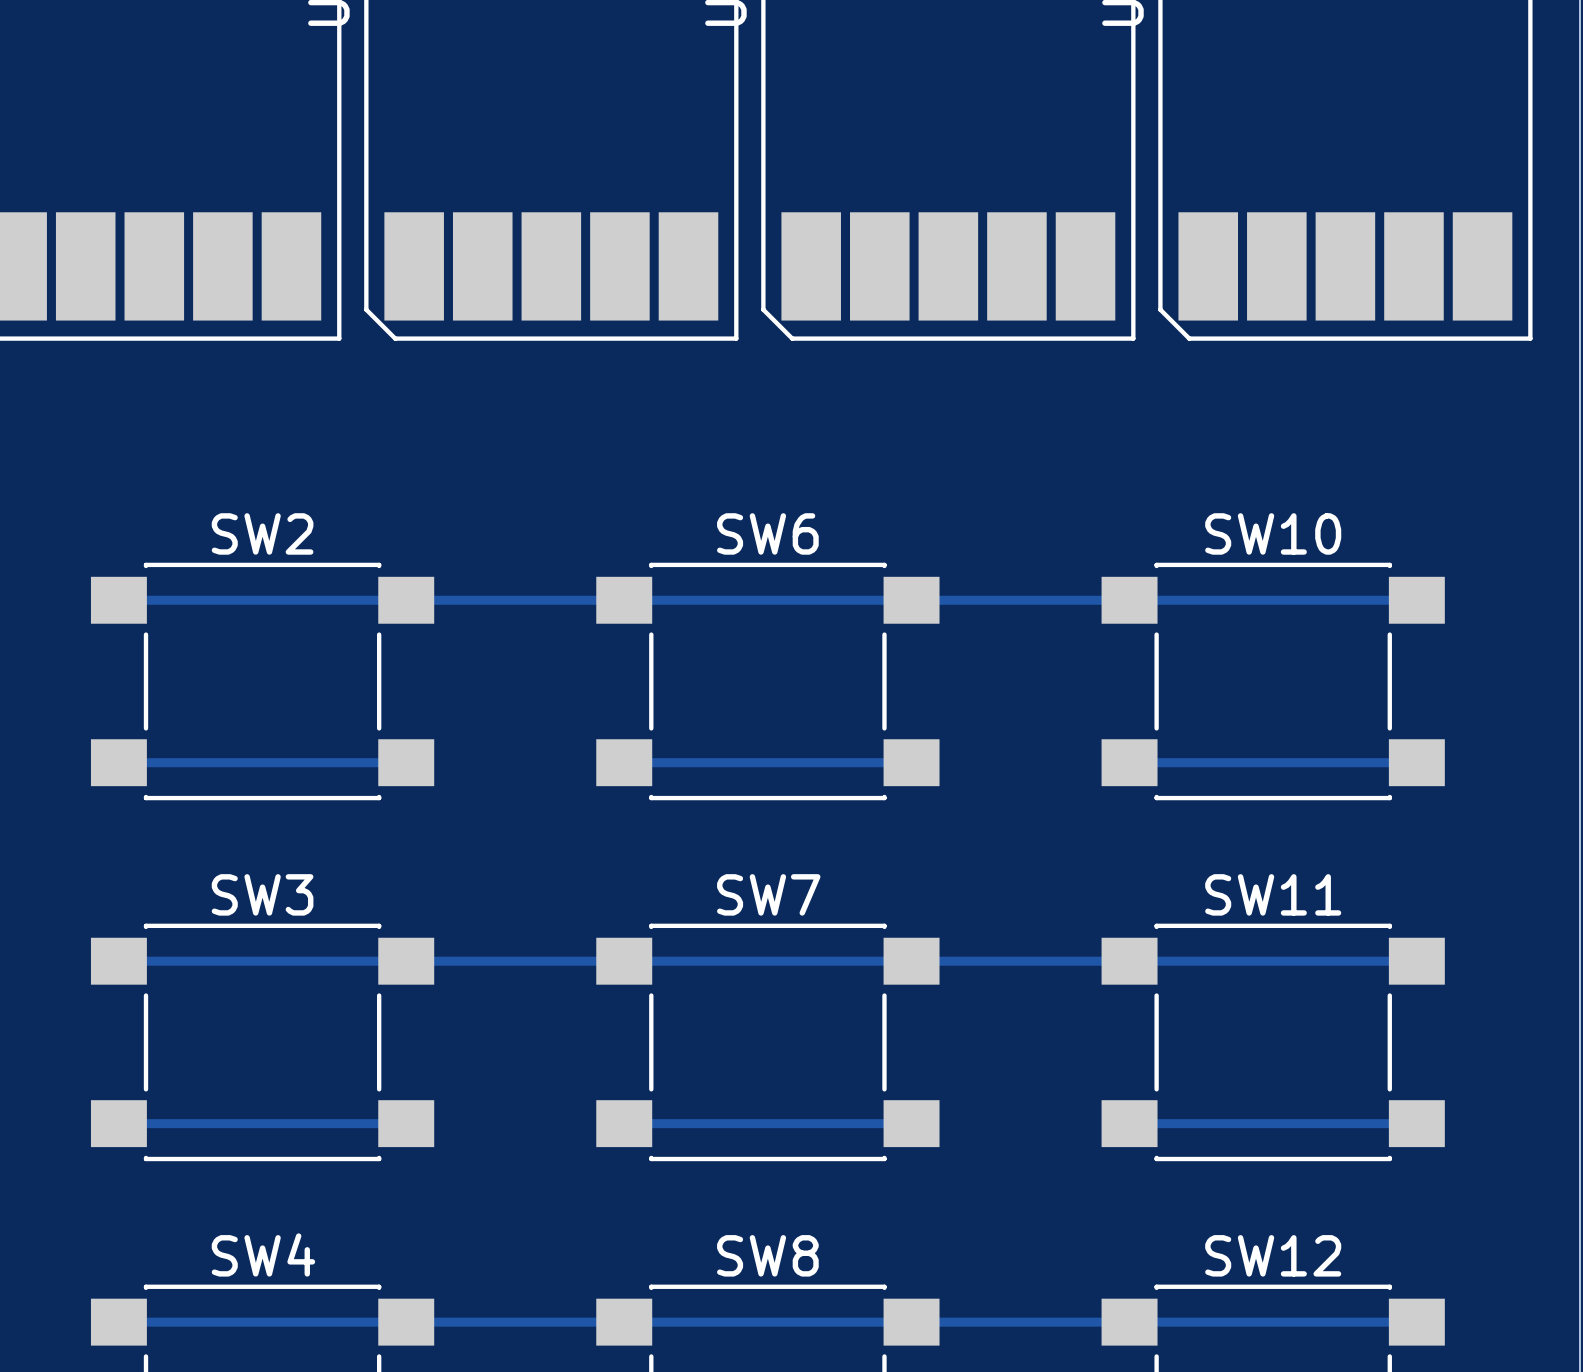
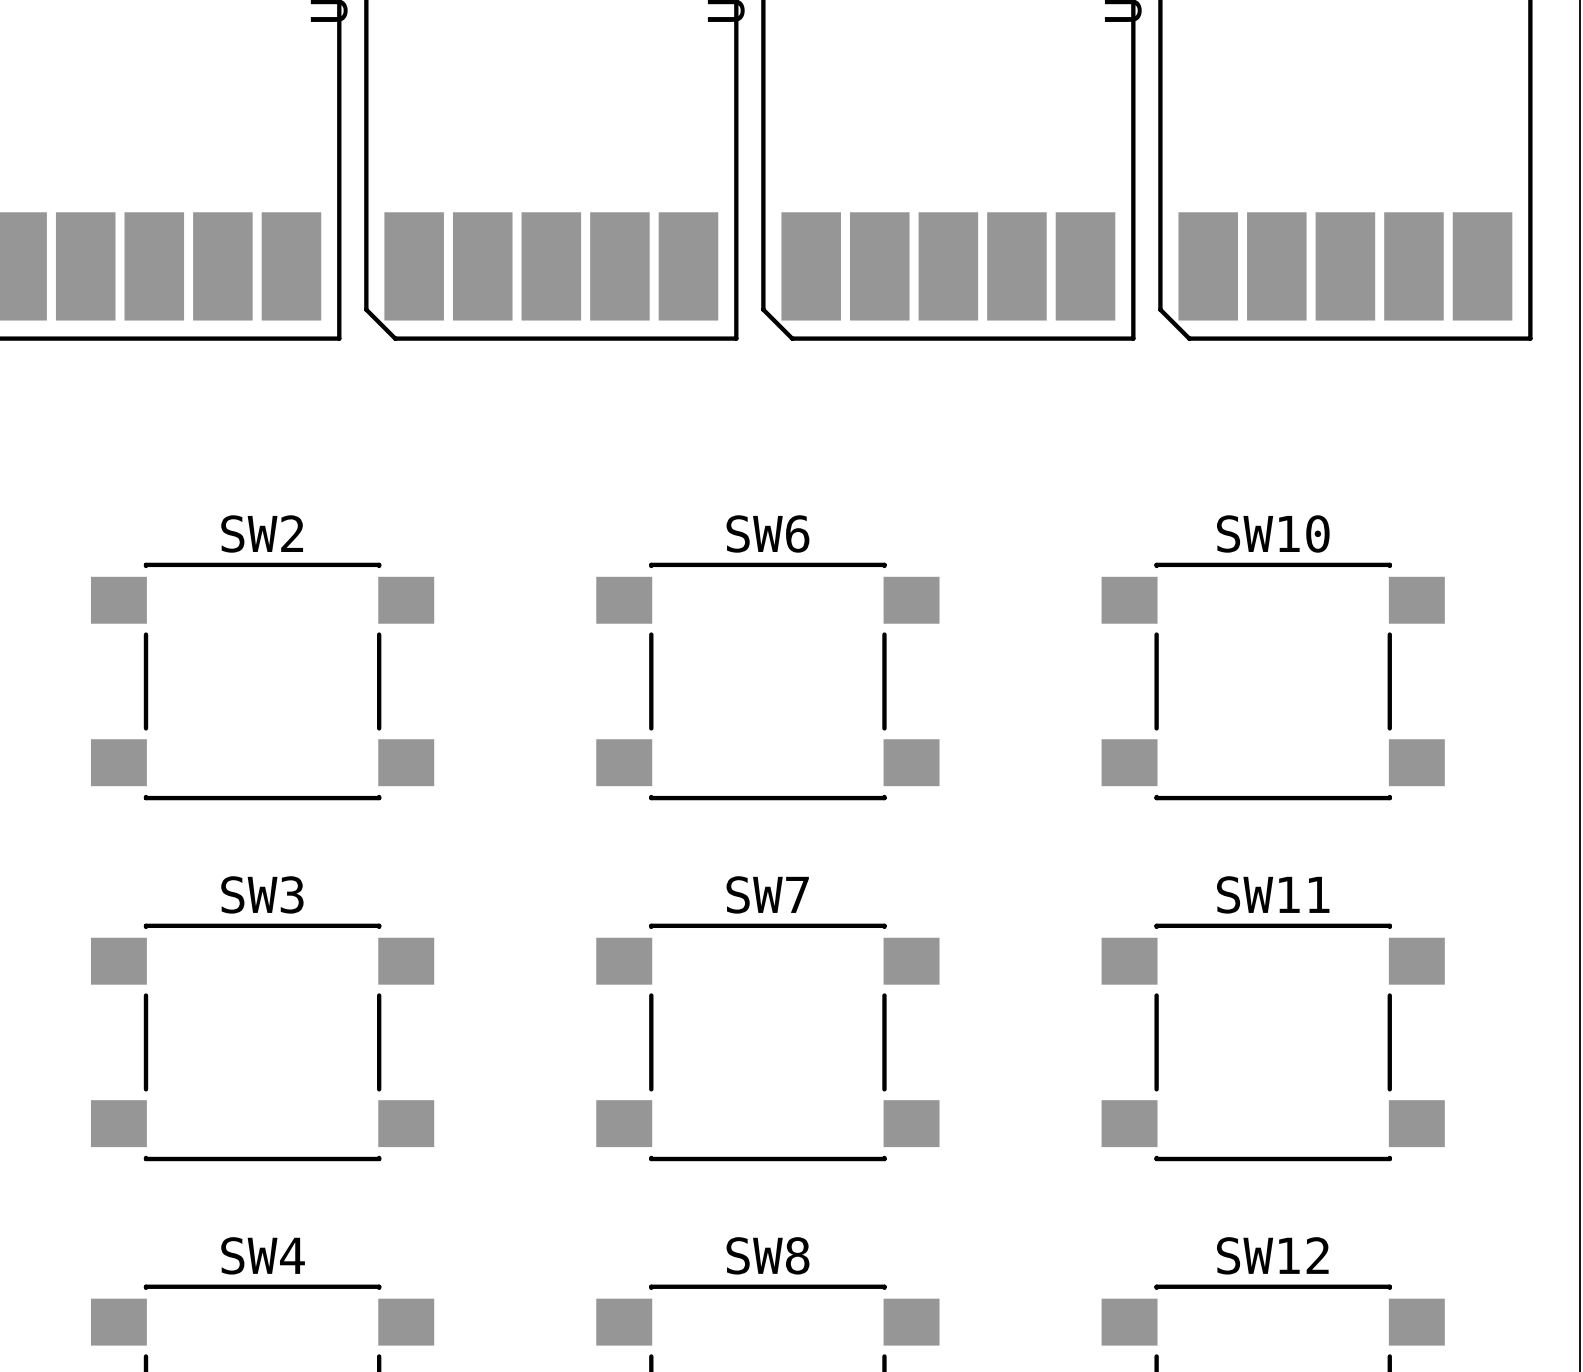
track: (118, 600) (1416, 600) -> none
track: (118, 762) (406, 762) -> none
track: (624, 762) (911, 762) -> none
track: (1129, 762) (1416, 762) -> none
track: (118, 961) (1416, 961) -> none
track: (118, 1123) (406, 1123) -> none
track: (624, 1123) (911, 1123) -> none
track: (1129, 1123) (1416, 1123) -> none
track: (118, 1322) (1416, 1322) -> none

